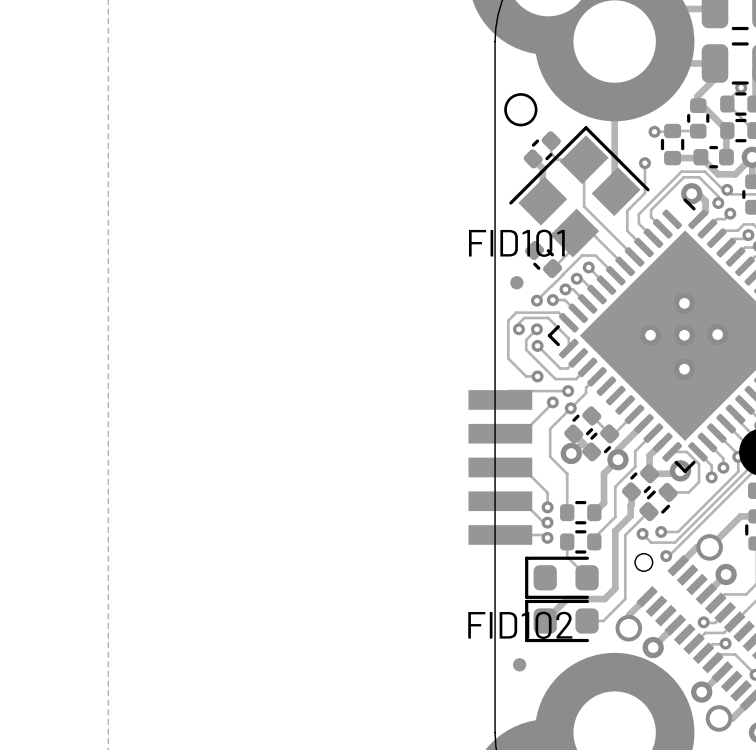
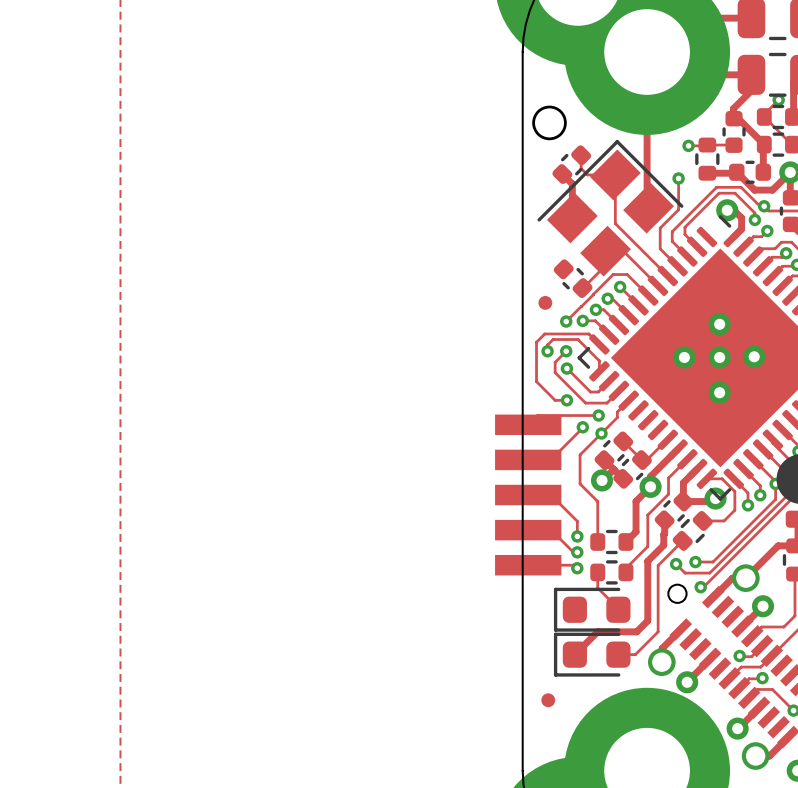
FID101 name: FID101 (516, 243) -> none
FID102 name: FID102 (520, 625) -> none

